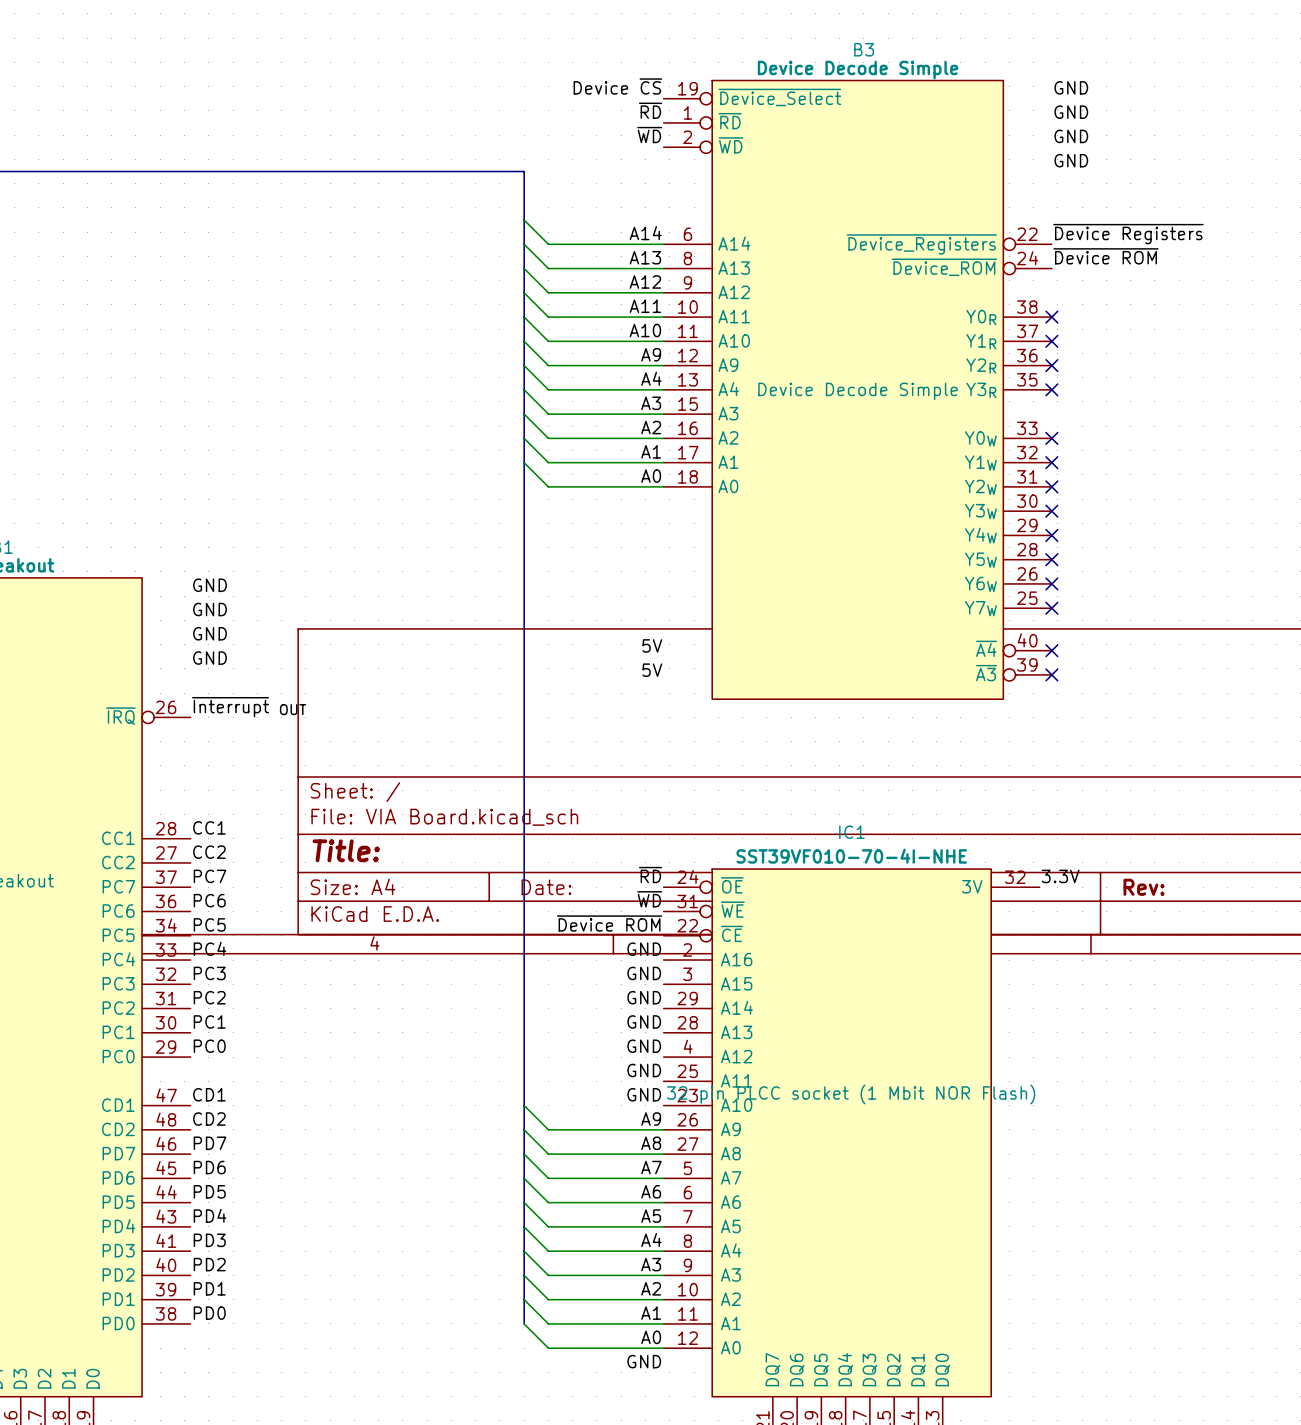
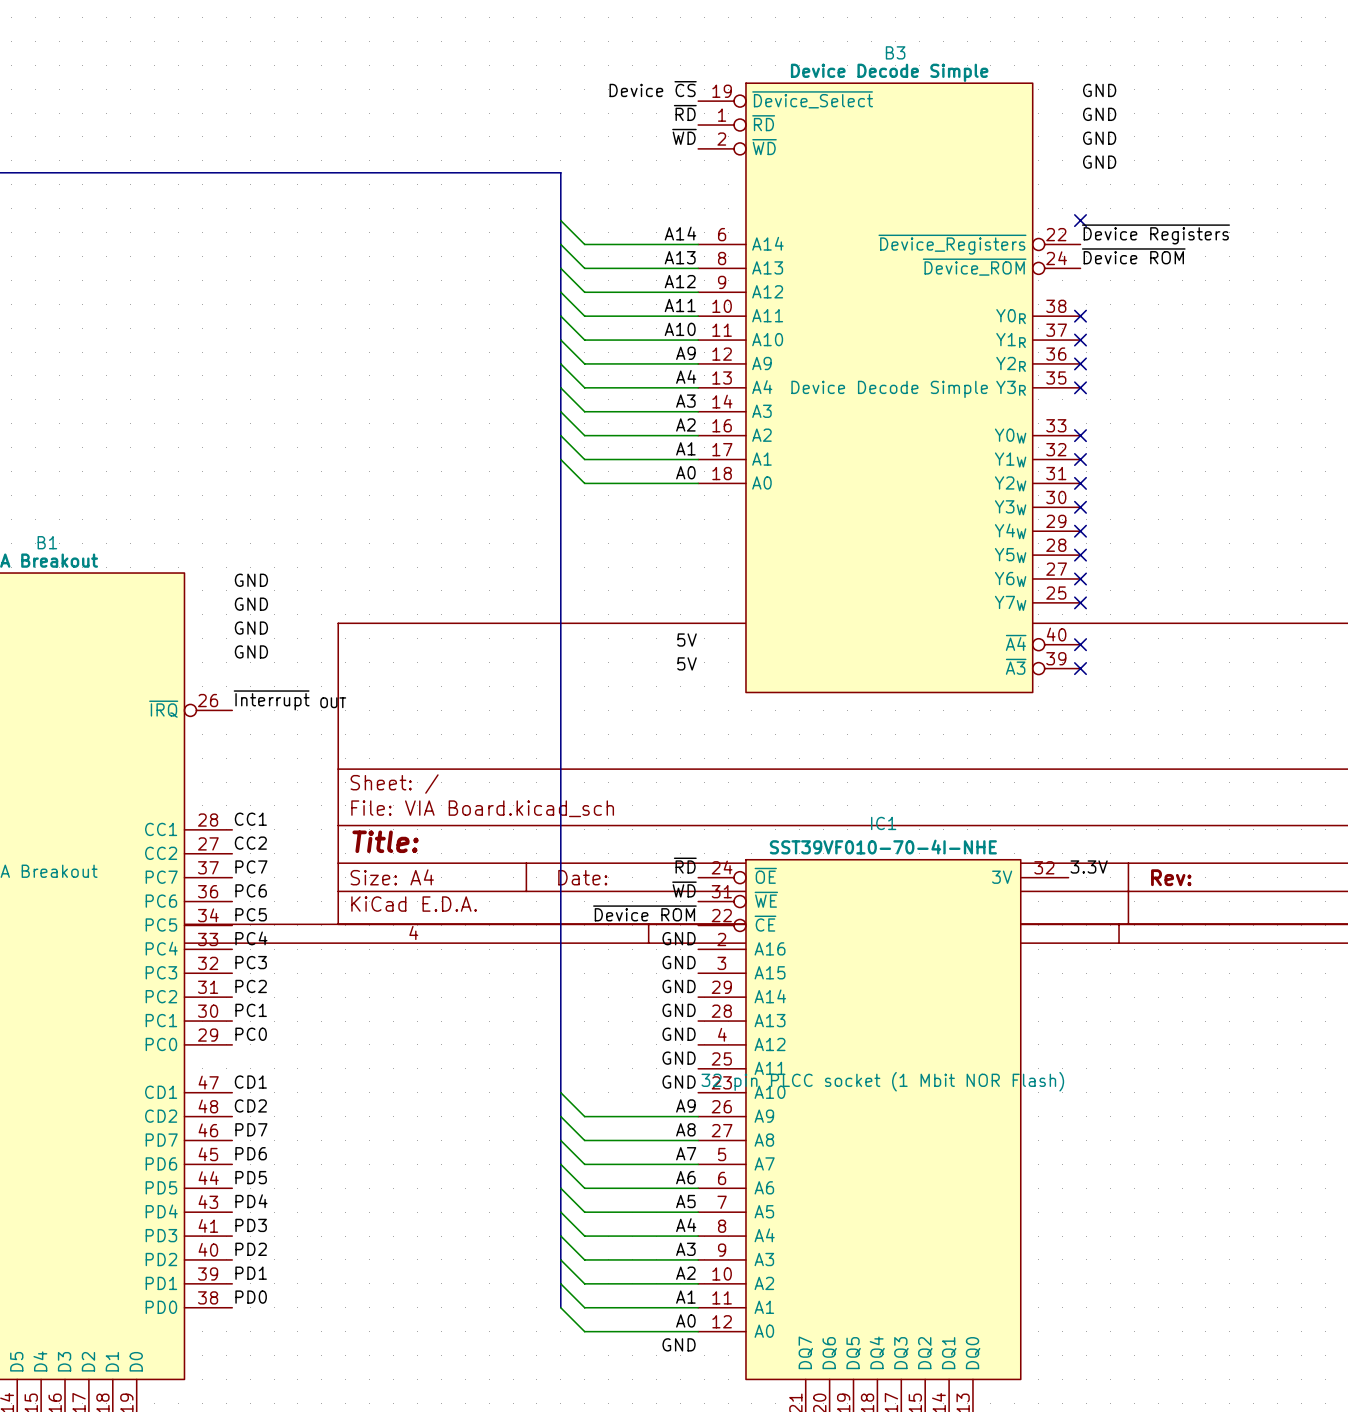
no-connect mark: none -> (1080, 220)
B3 pin number: 15 (687, 404) -> 14 (722, 401)
B3 pin number: 26 (1027, 573) -> 27 (1056, 569)

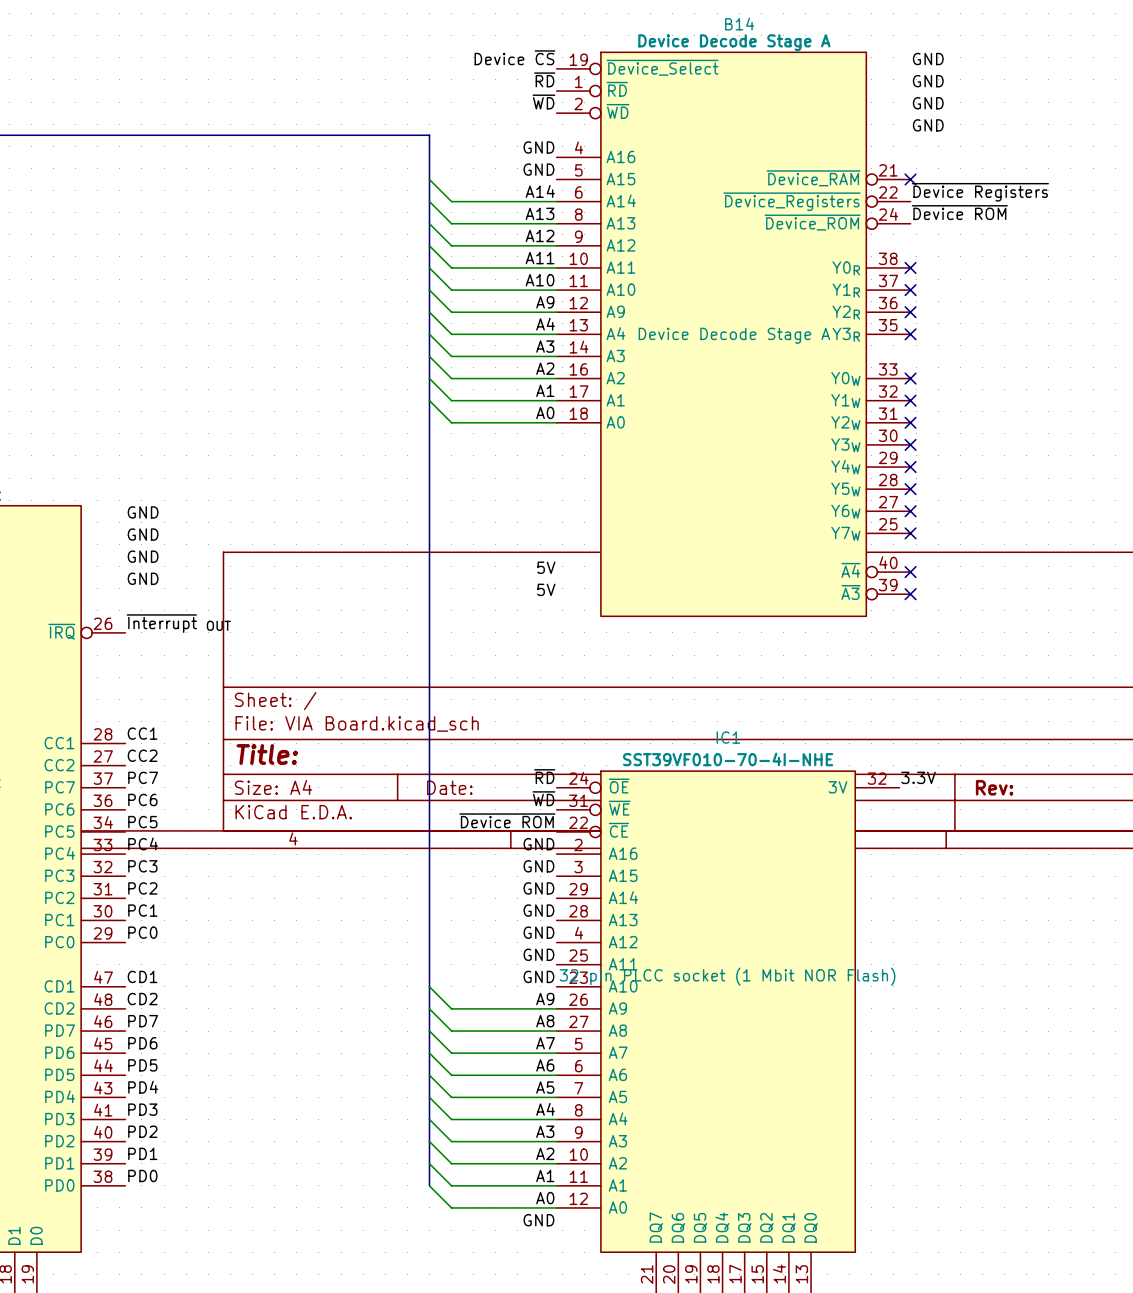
label: none -> GND (538, 147)
label: none -> GND (538, 169)
B3: Device Decode Simple (889, 387) -> none
B14: none -> Device Decode Stage A (733, 334)

